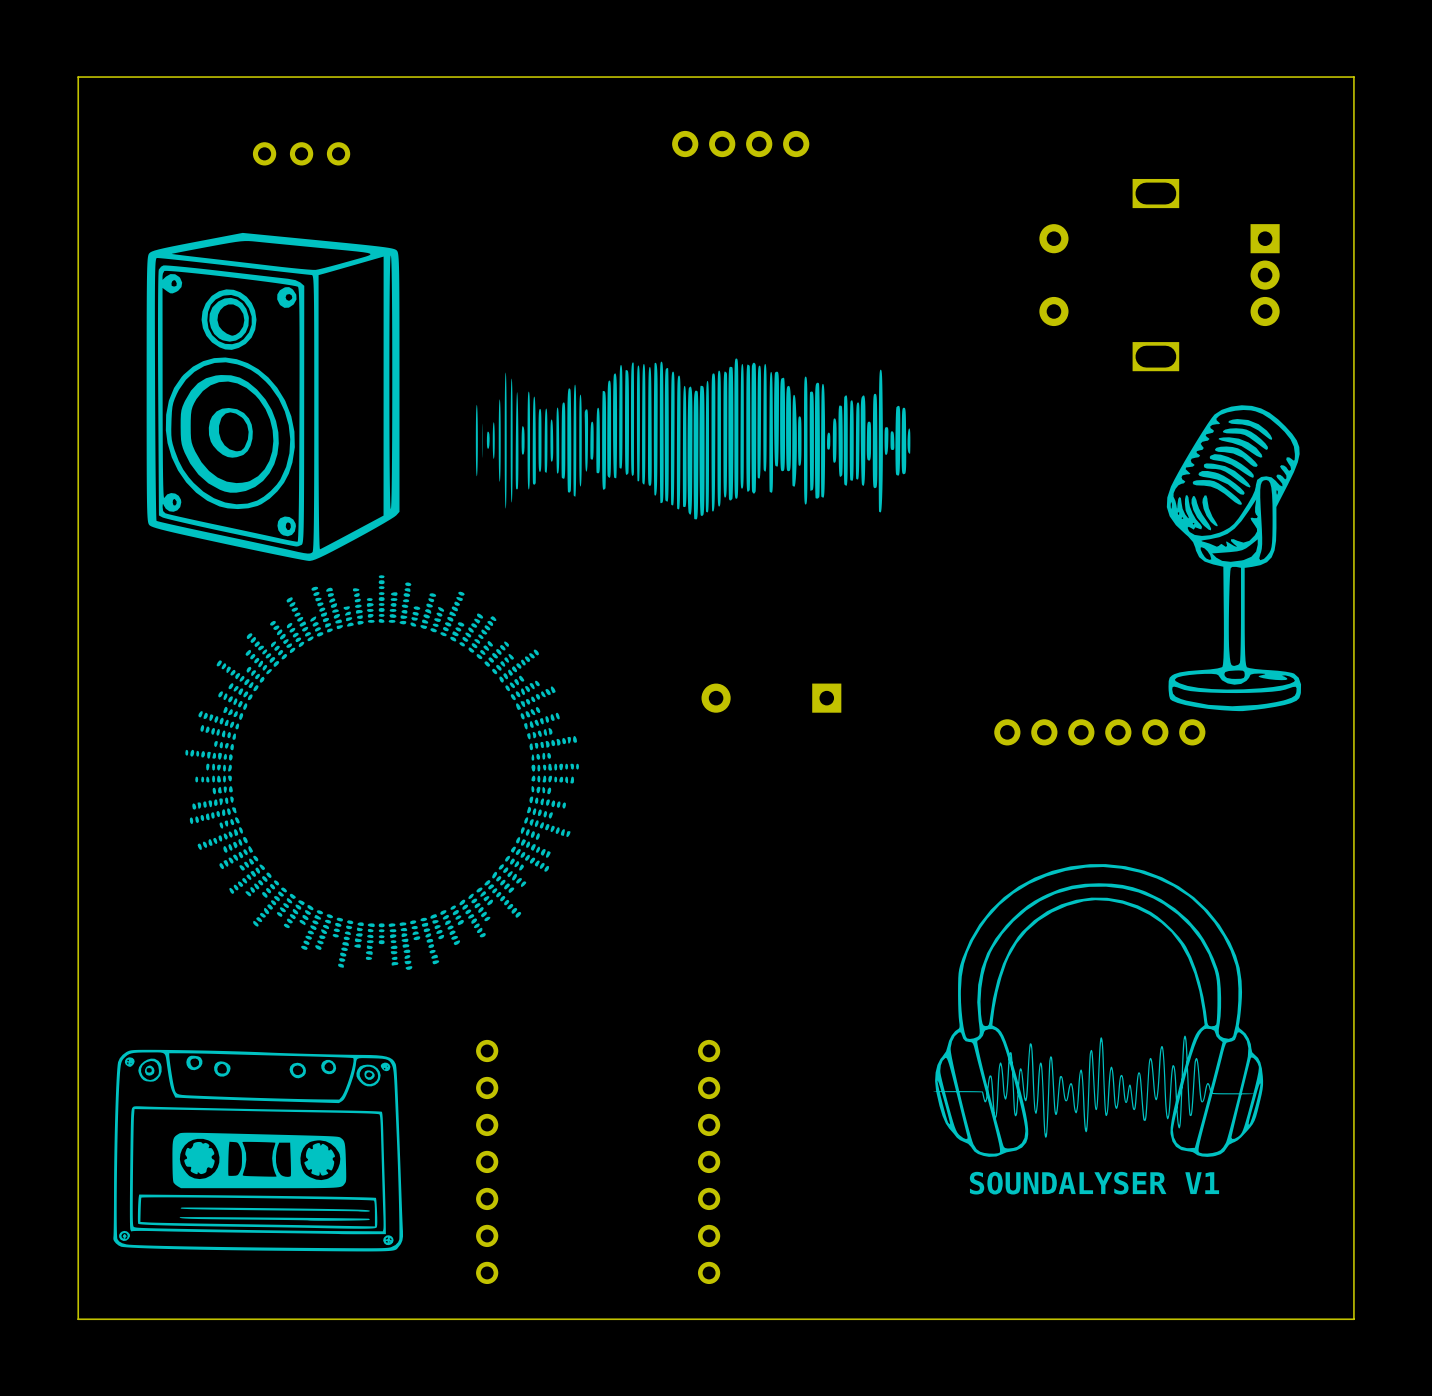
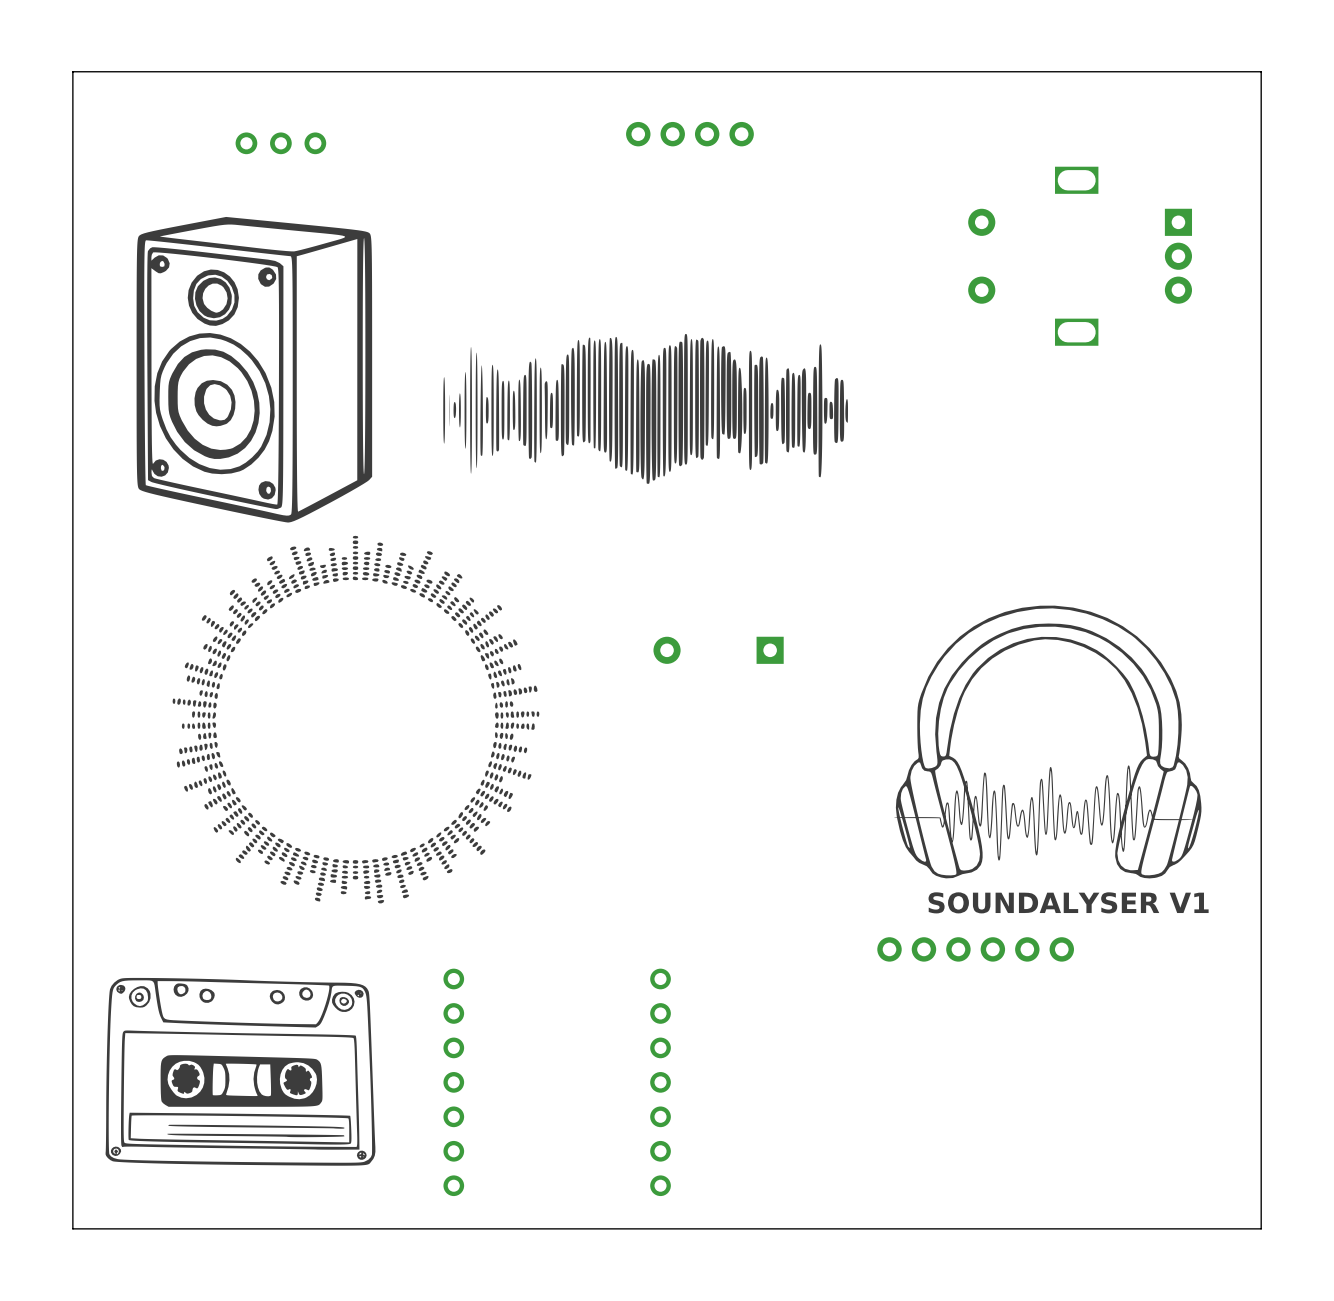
drawing: [1166, 405, 1302, 712] -> none
part position: (1099, 732) -> (975, 949)
drawing position: (1099, 1010) -> (1048, 742)
drawing position: (1093, 1086) -> (1043, 812)
text position: SOUNDALYSER V1 (1094, 1183) -> SOUNDALYSER V1 (1068, 902)

